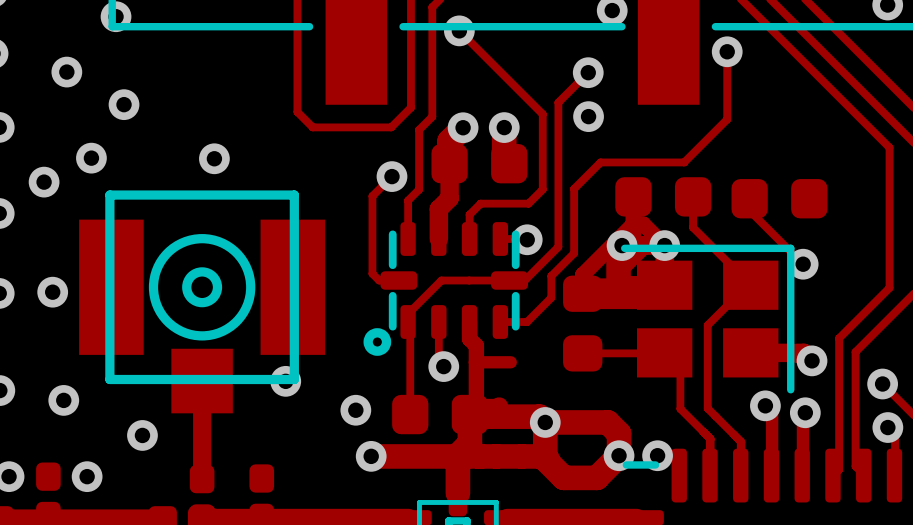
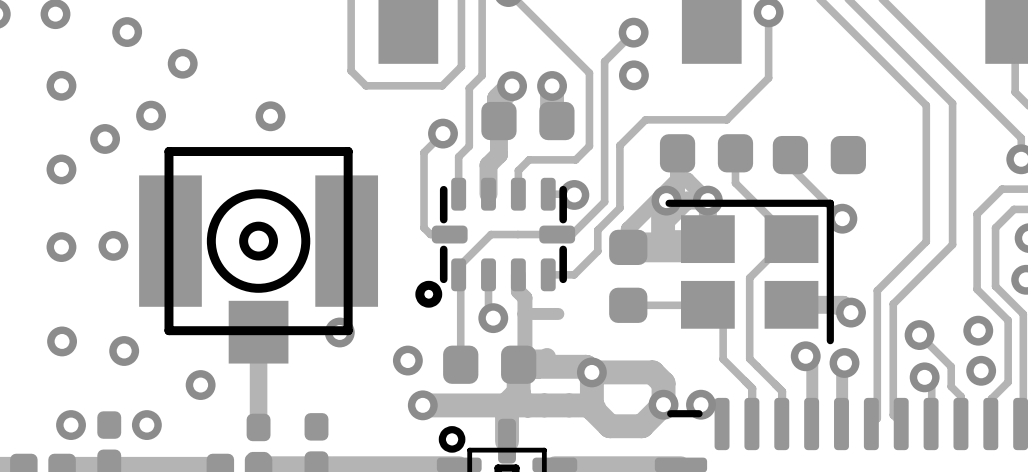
drawing: none -> [438, 426, 466, 453]

